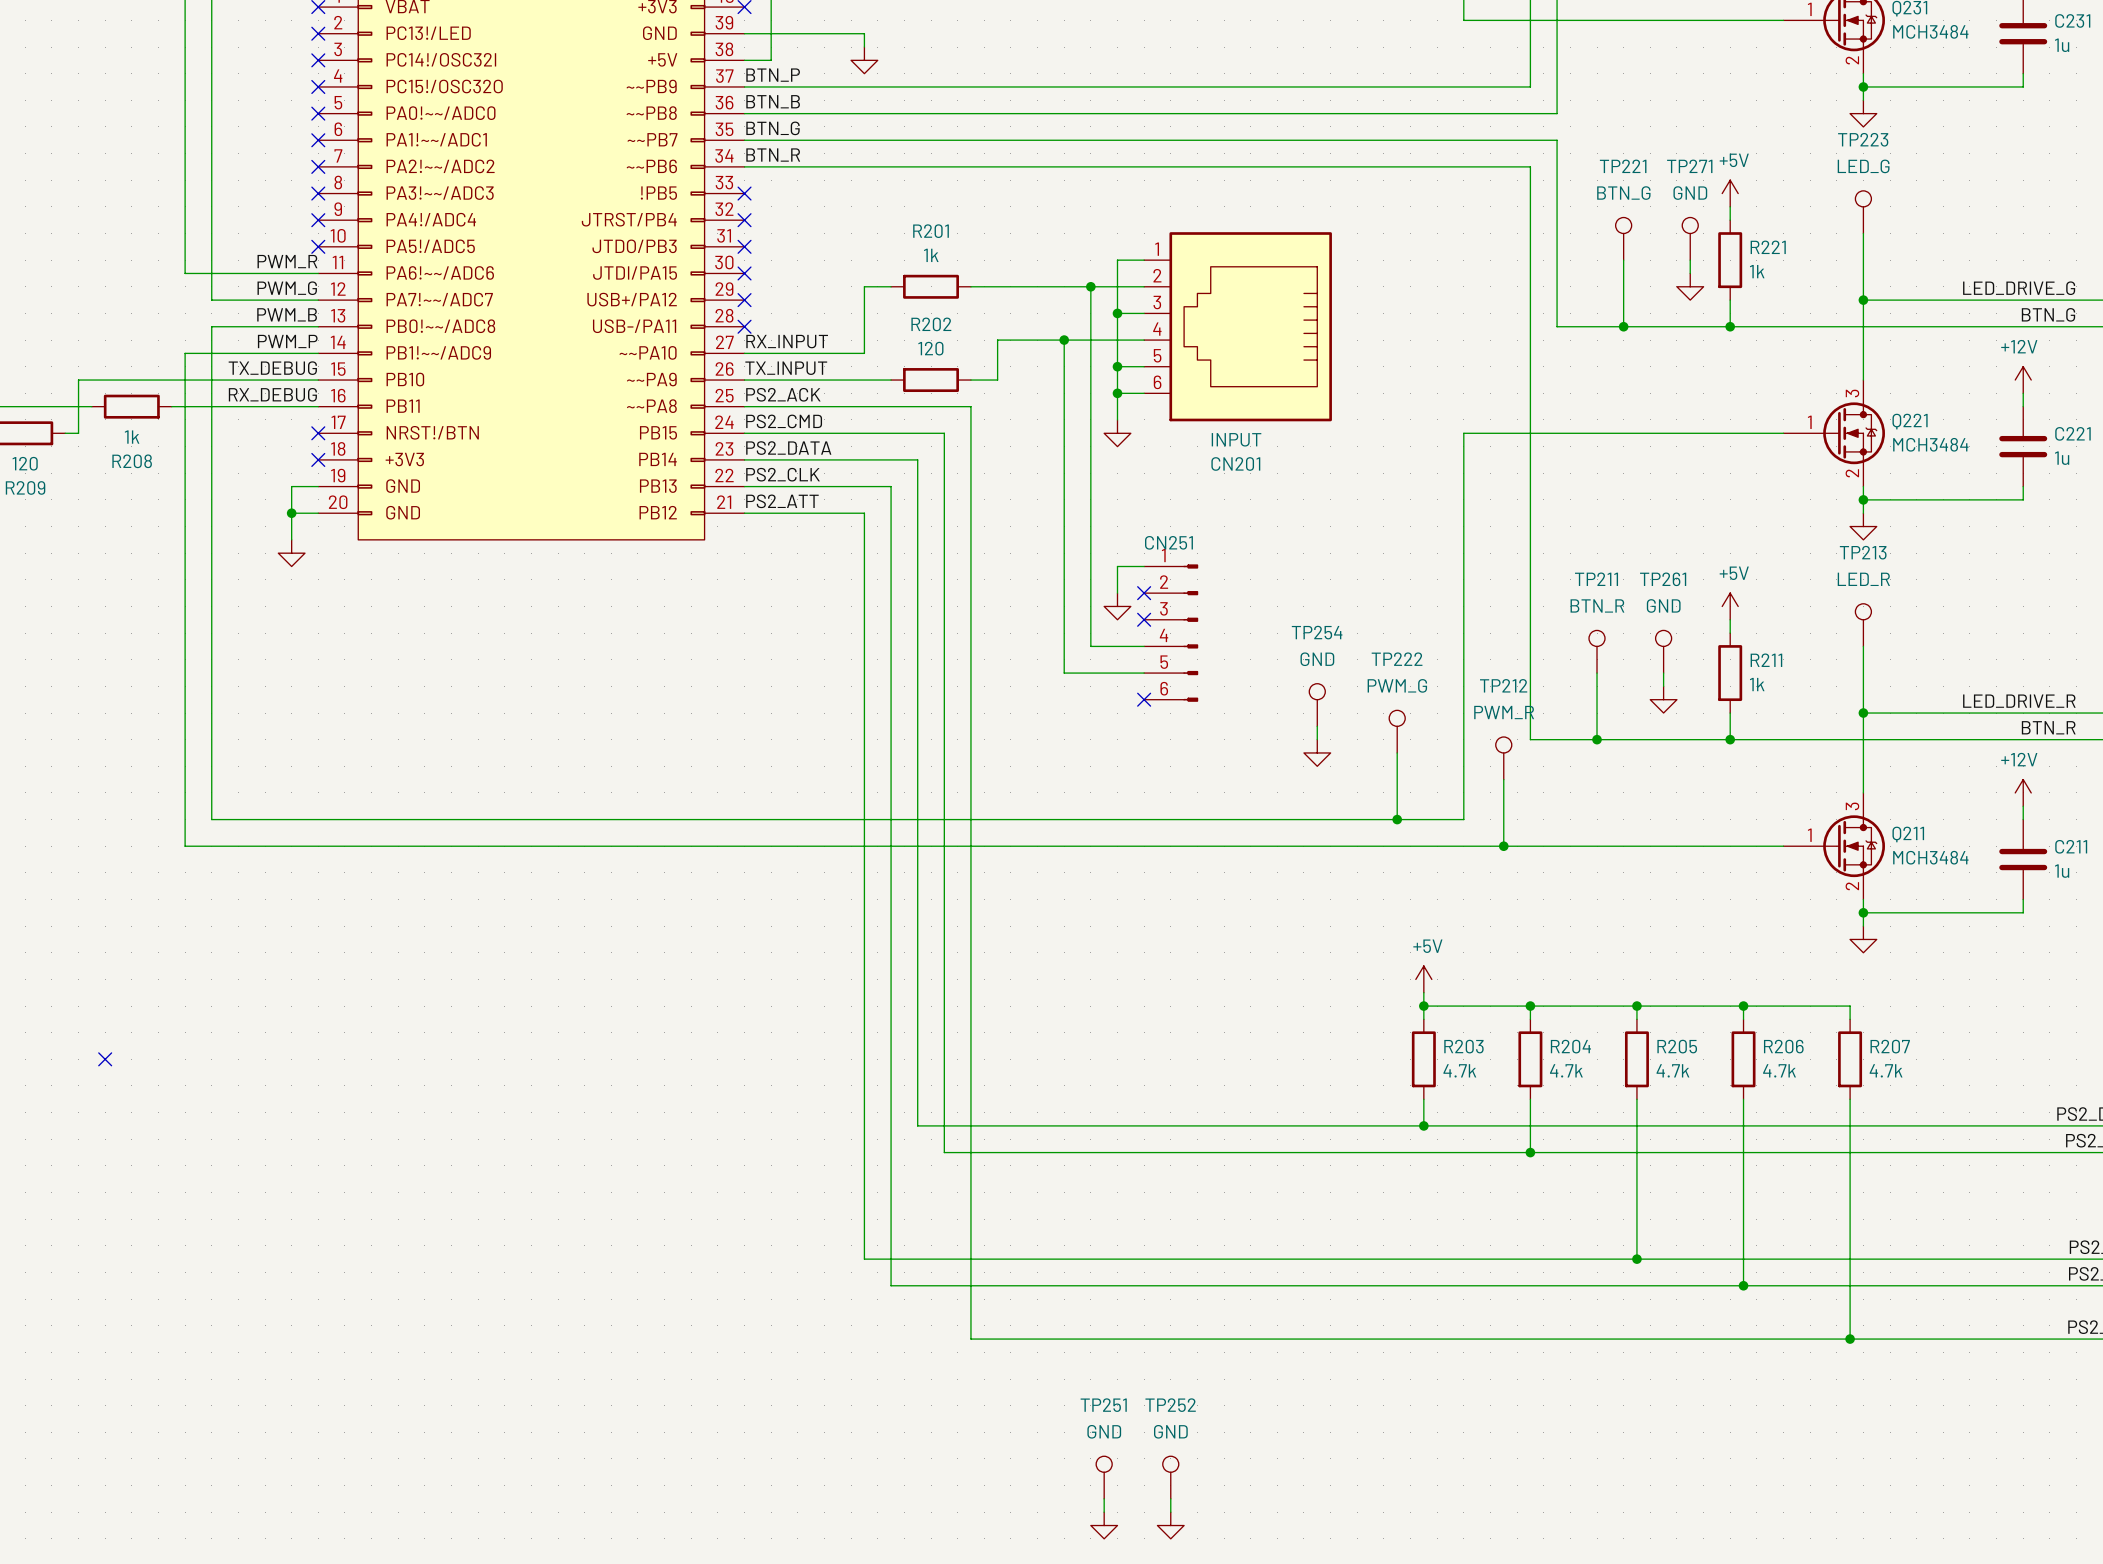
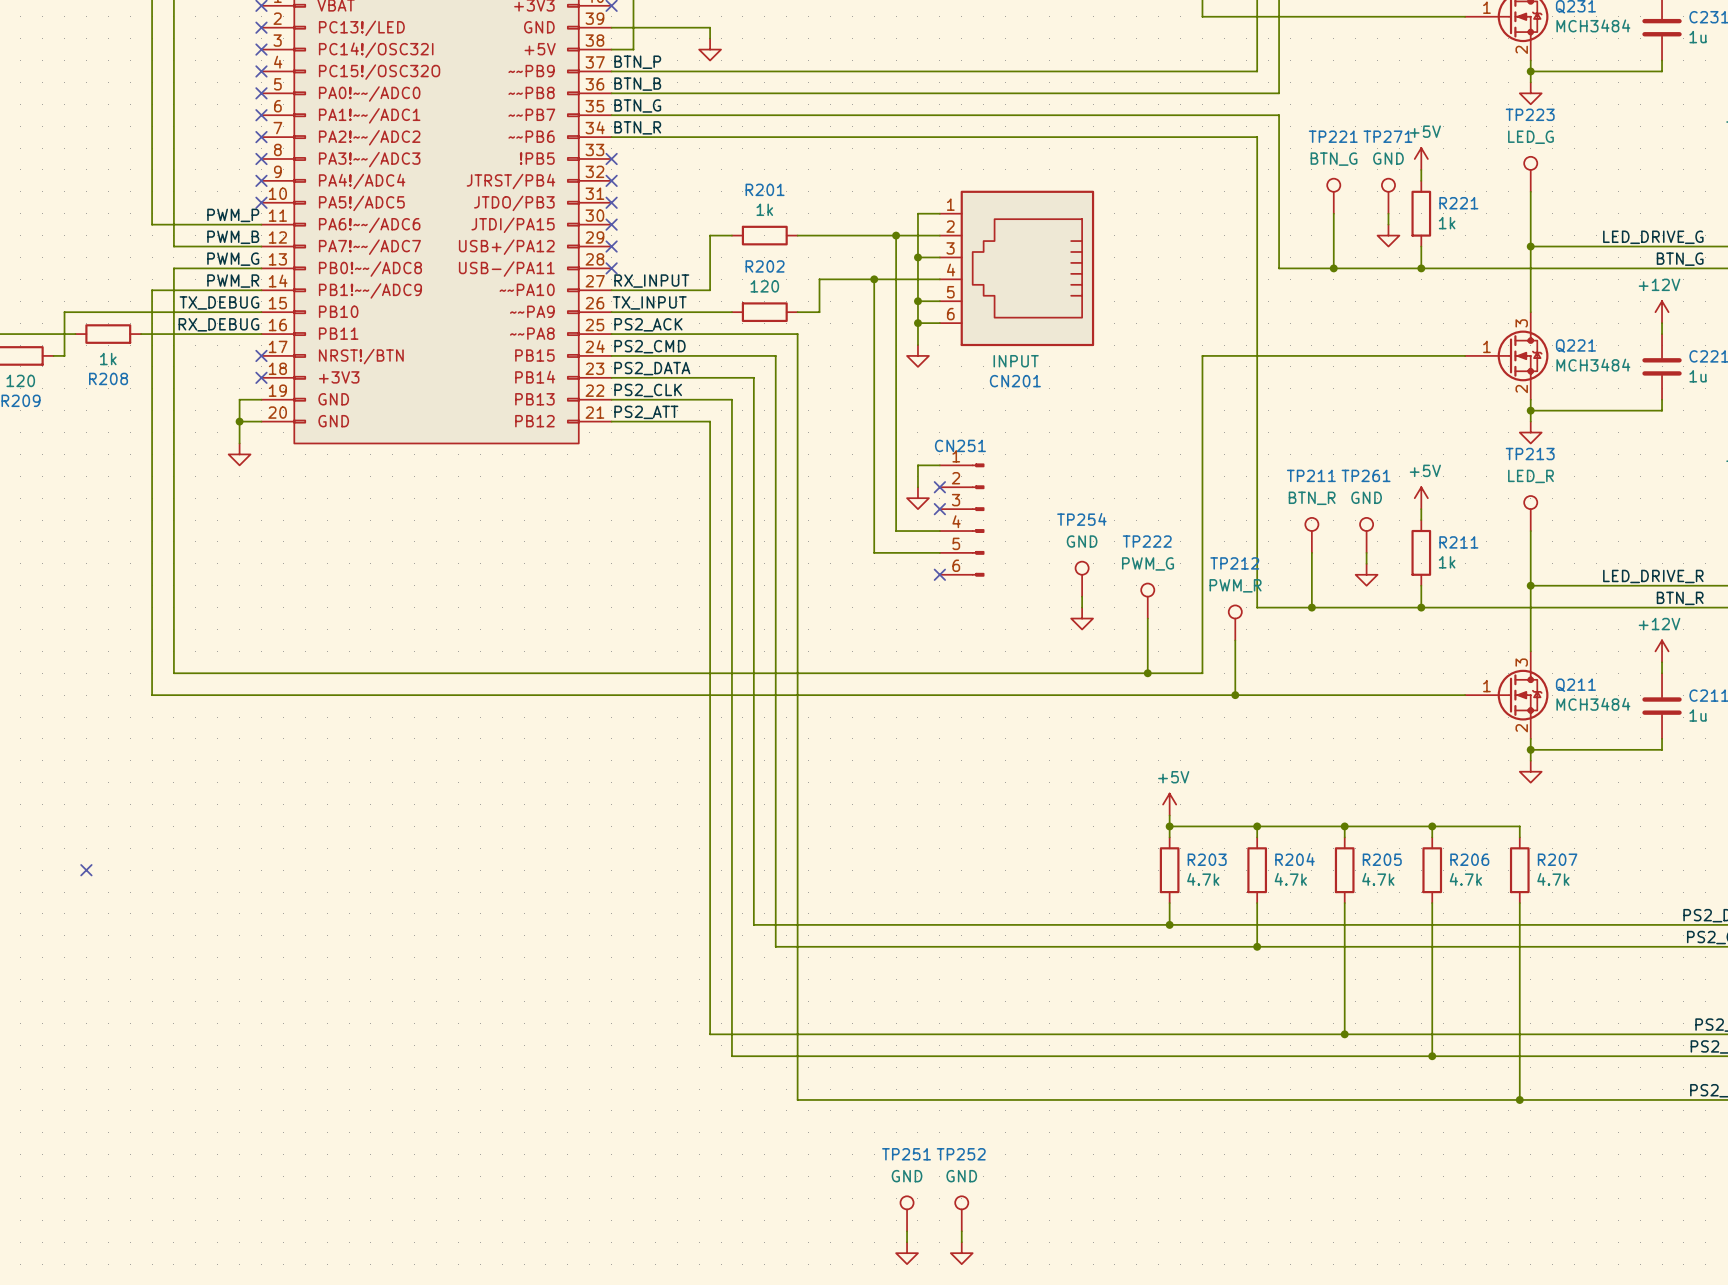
label: PWM_R (287, 261) -> PWM_P (233, 215)
label: PWM_G (287, 288) -> PWM_B (233, 237)
label: PWM_B (287, 314) -> PWM_G (233, 259)
label: PWM_P (287, 341) -> PWM_R (233, 281)

